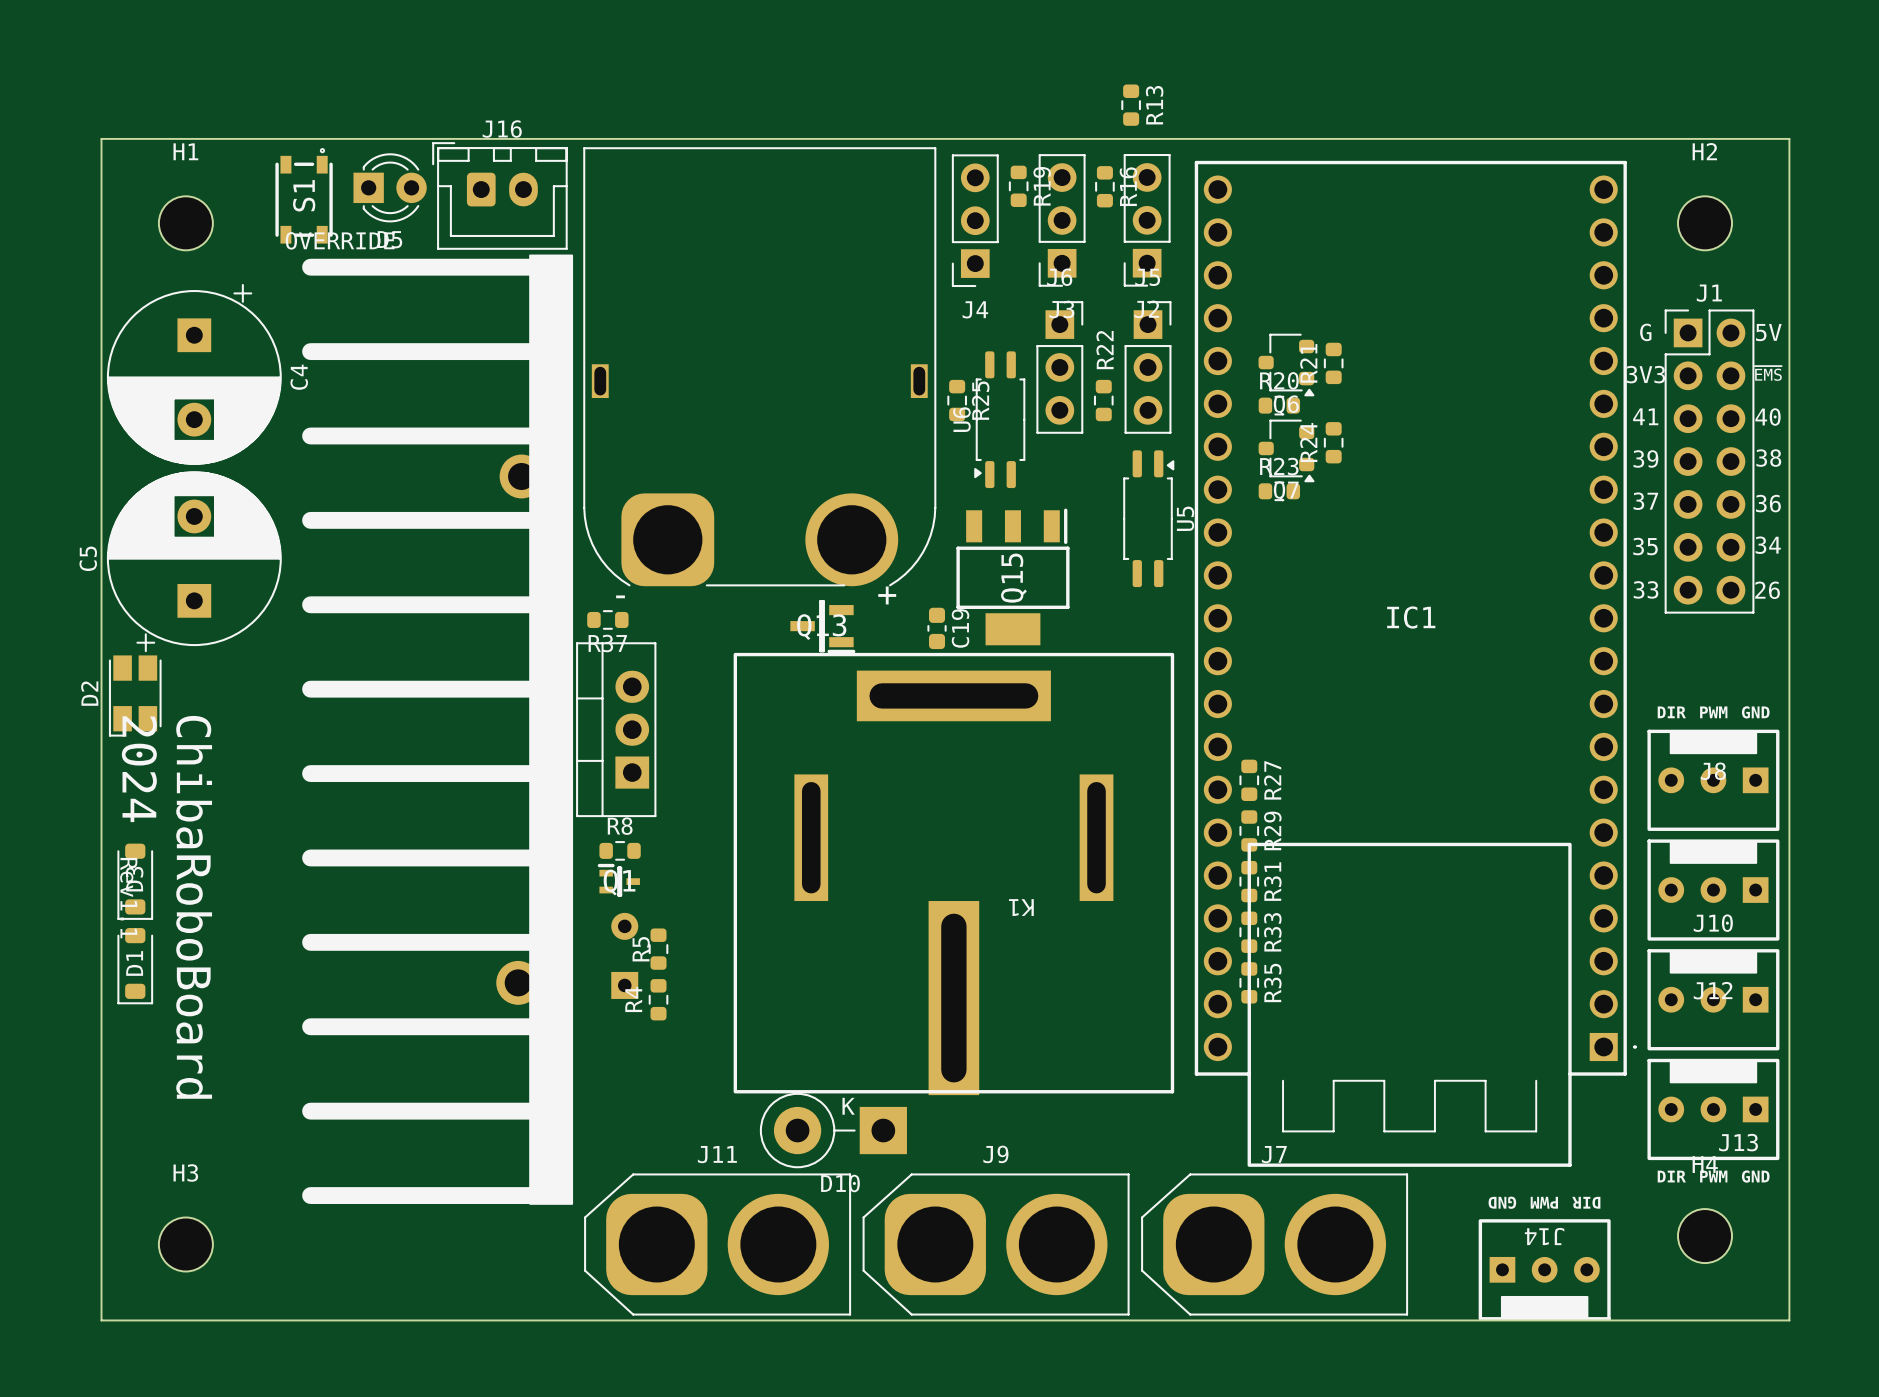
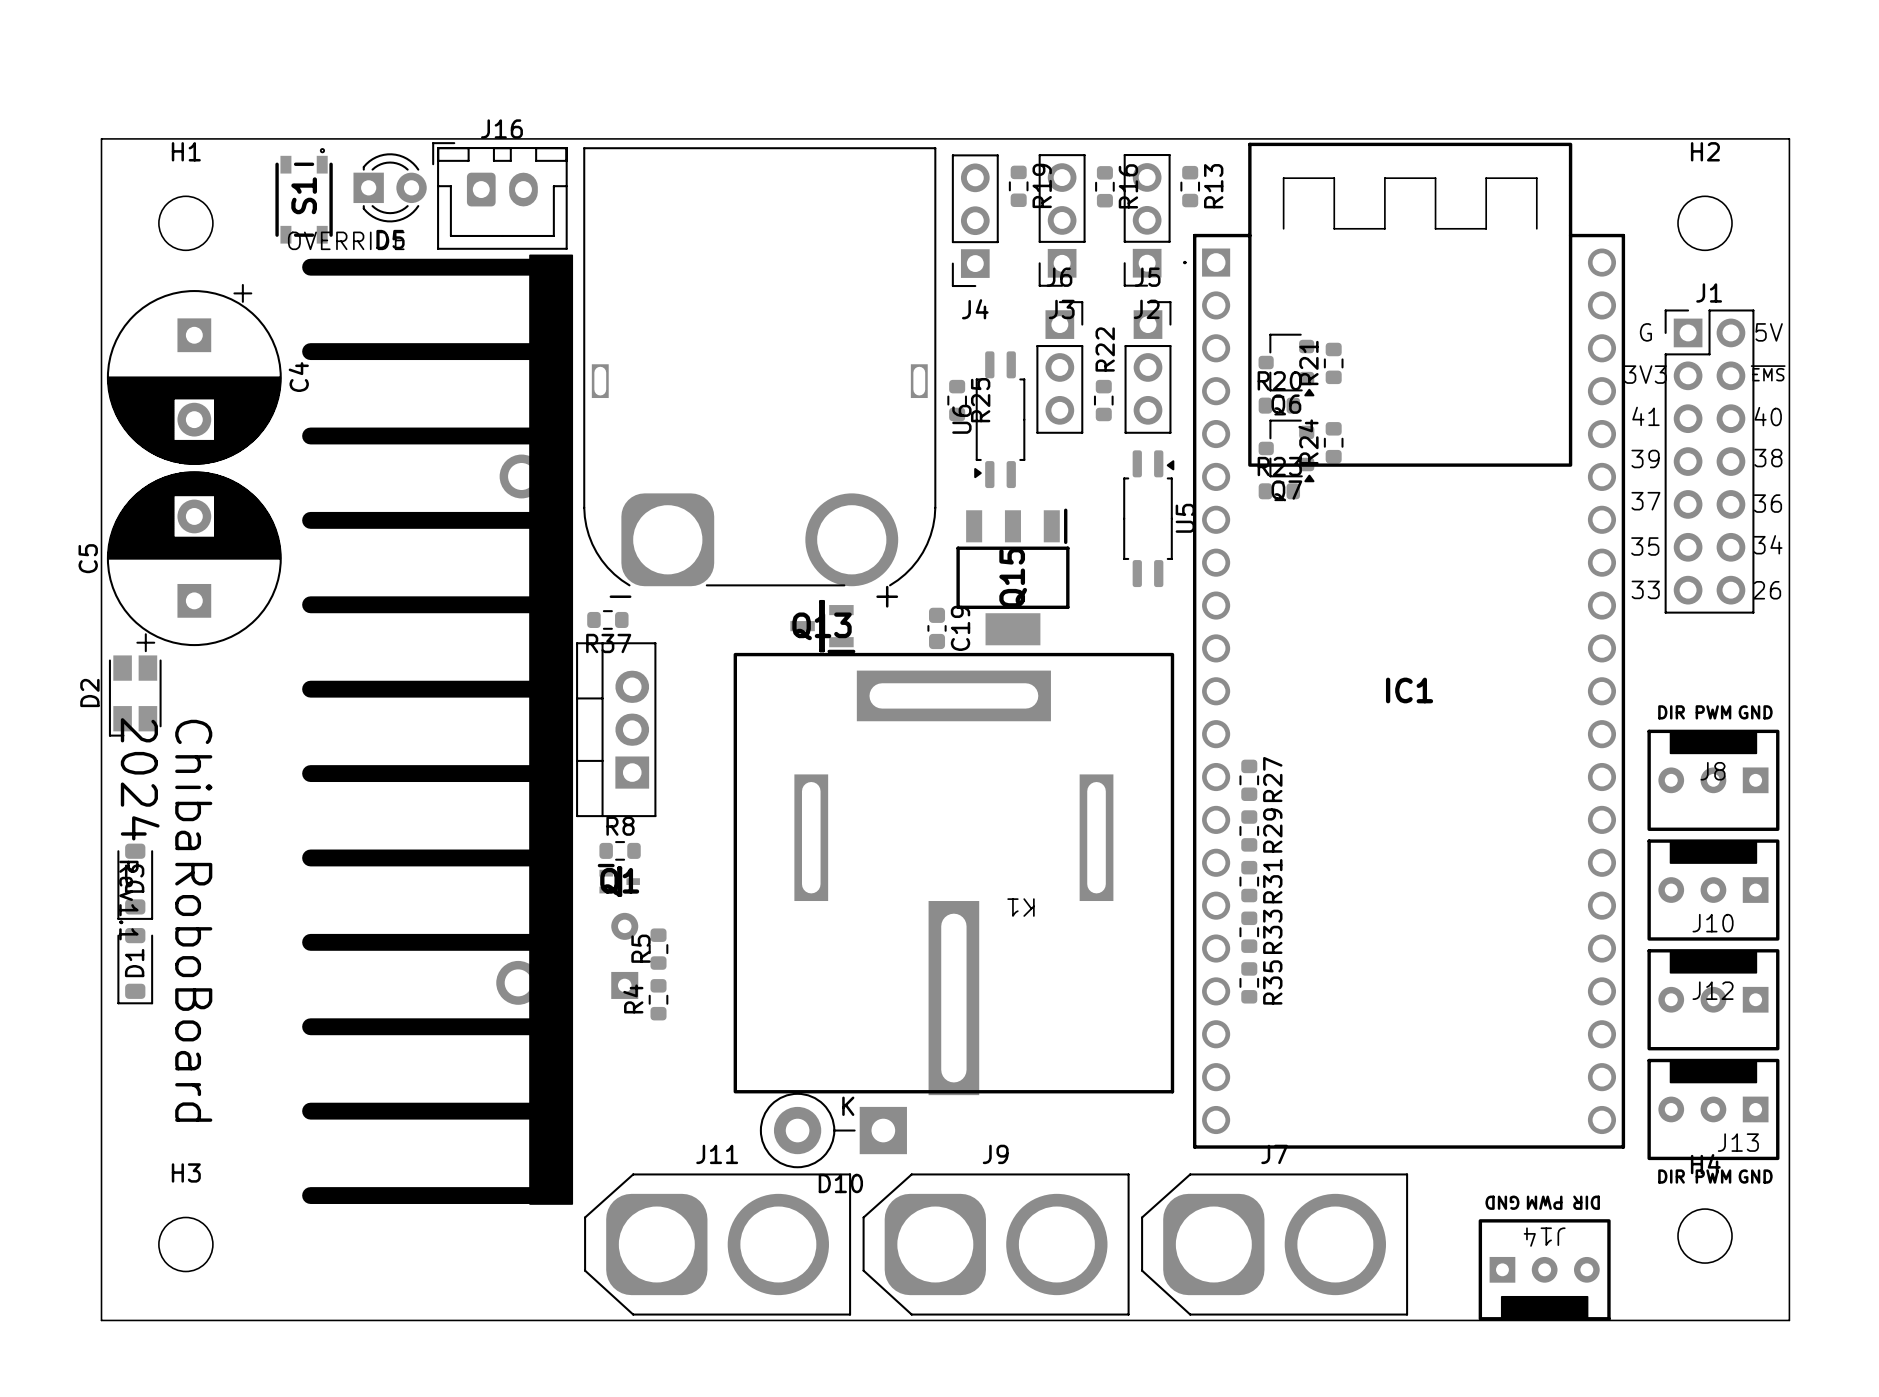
R13 position: (1131, 105) -> (1190, 186)
IC1 rotation: 0° (1415, 663) -> 180° (1404, 645)

